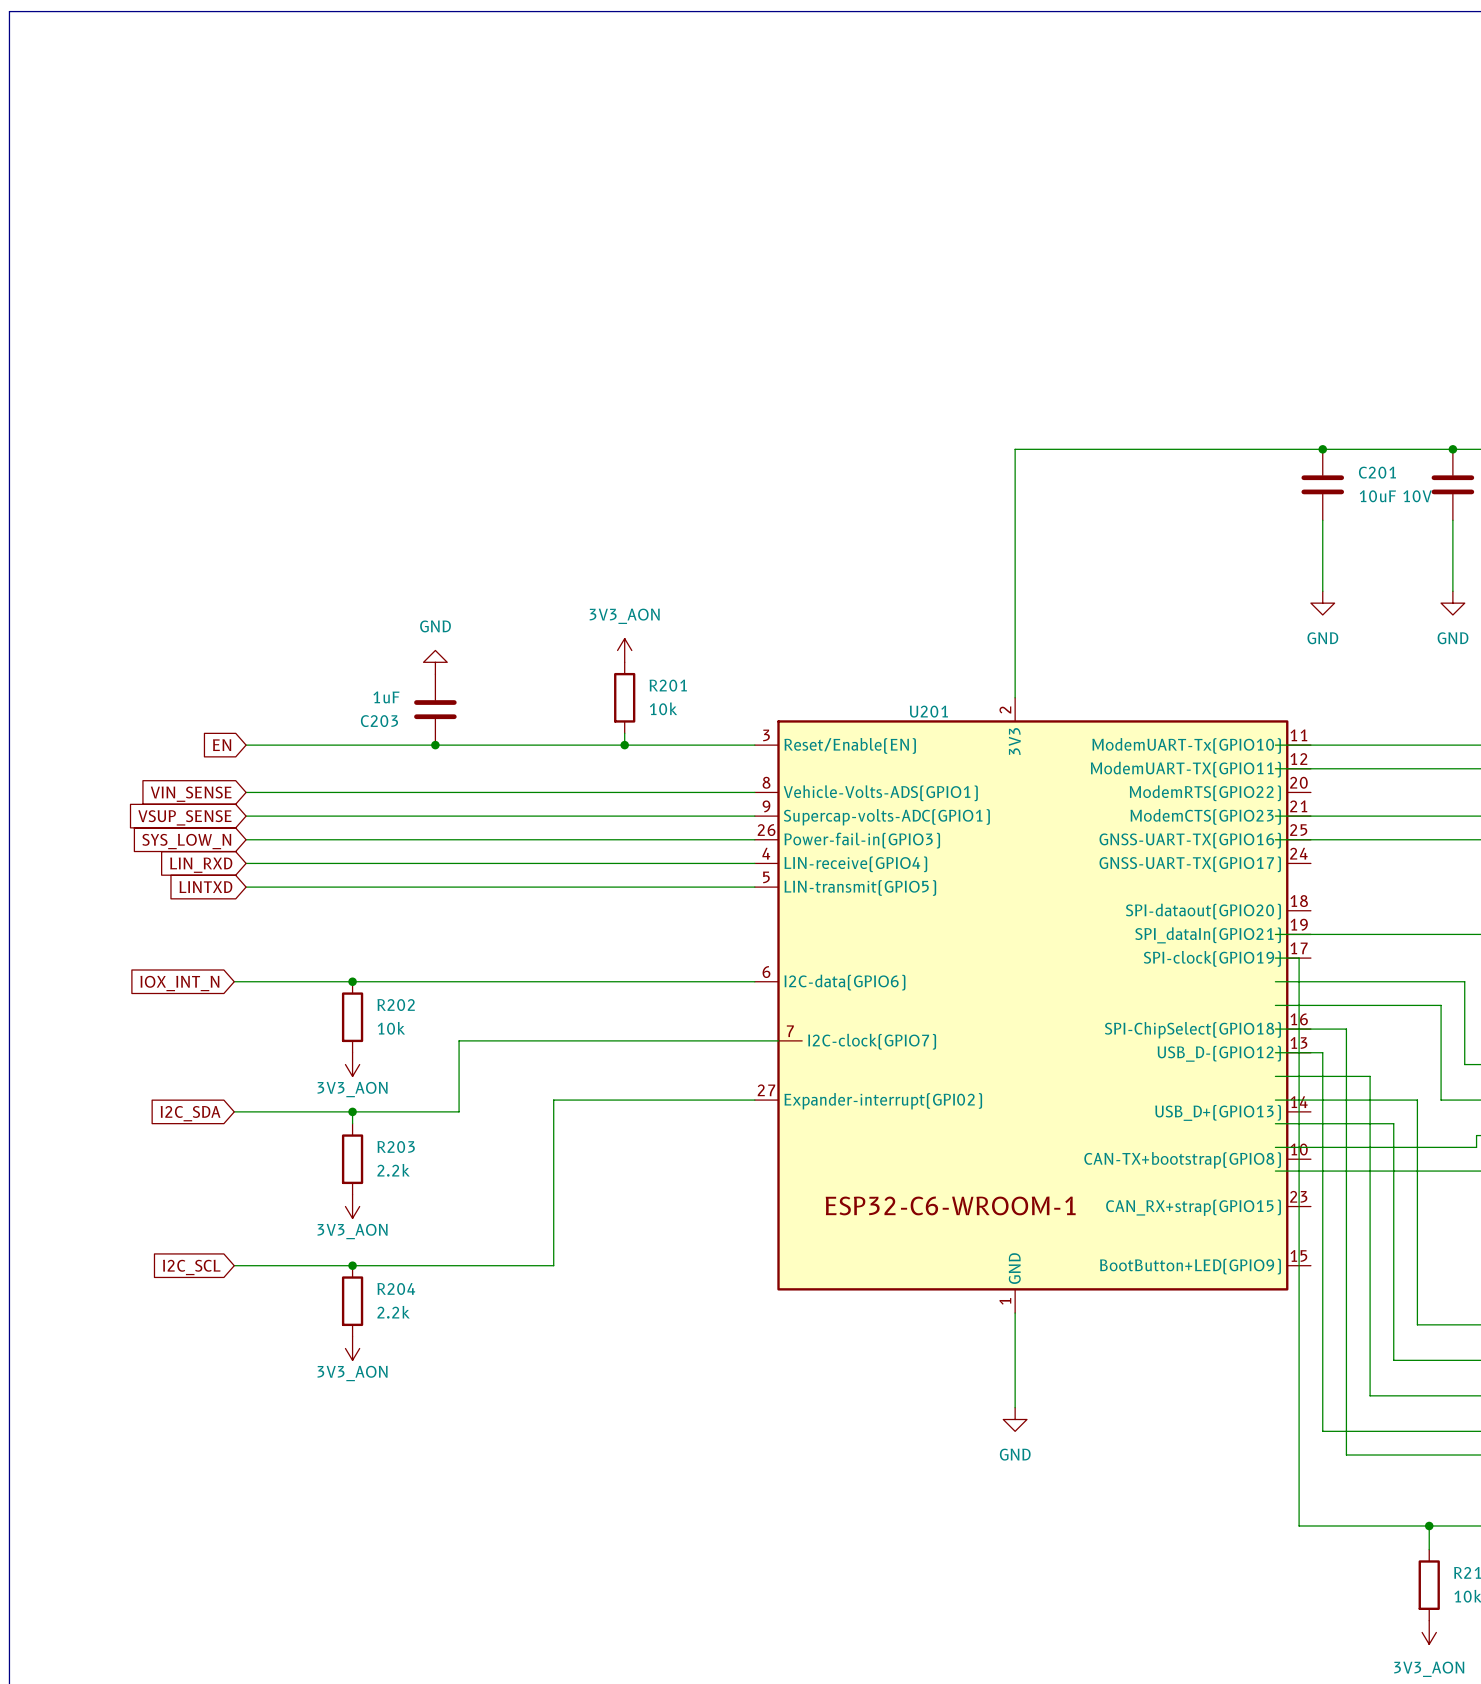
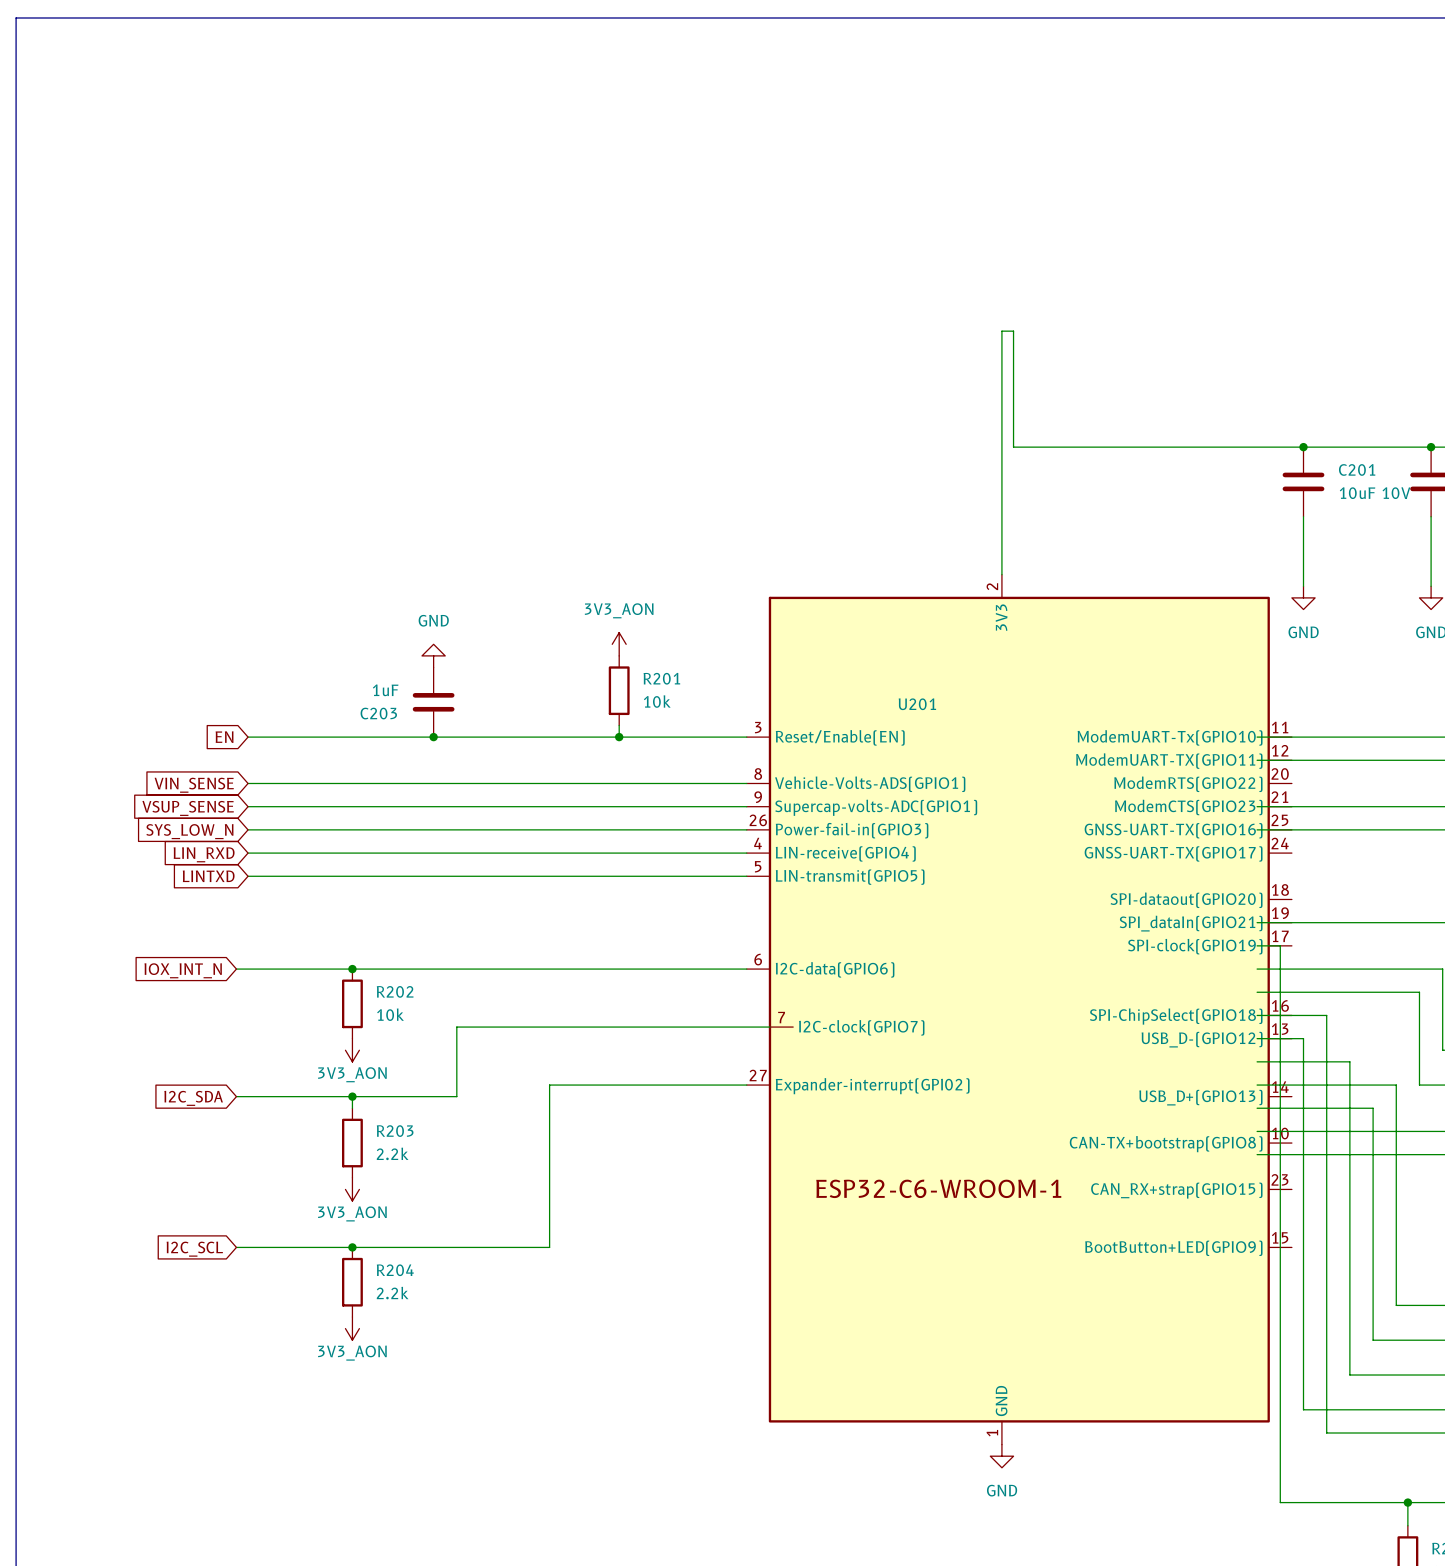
wire: (1015, 449) (1026, 449) -> (1001, 447) (1001, 331) (1013, 331) (1013, 447)
U201 symbol: [754, 697, 1311, 1314] -> [746, 574, 1292, 1445]
power symbol position: GND (1015, 1419) -> GND (1001, 1456)

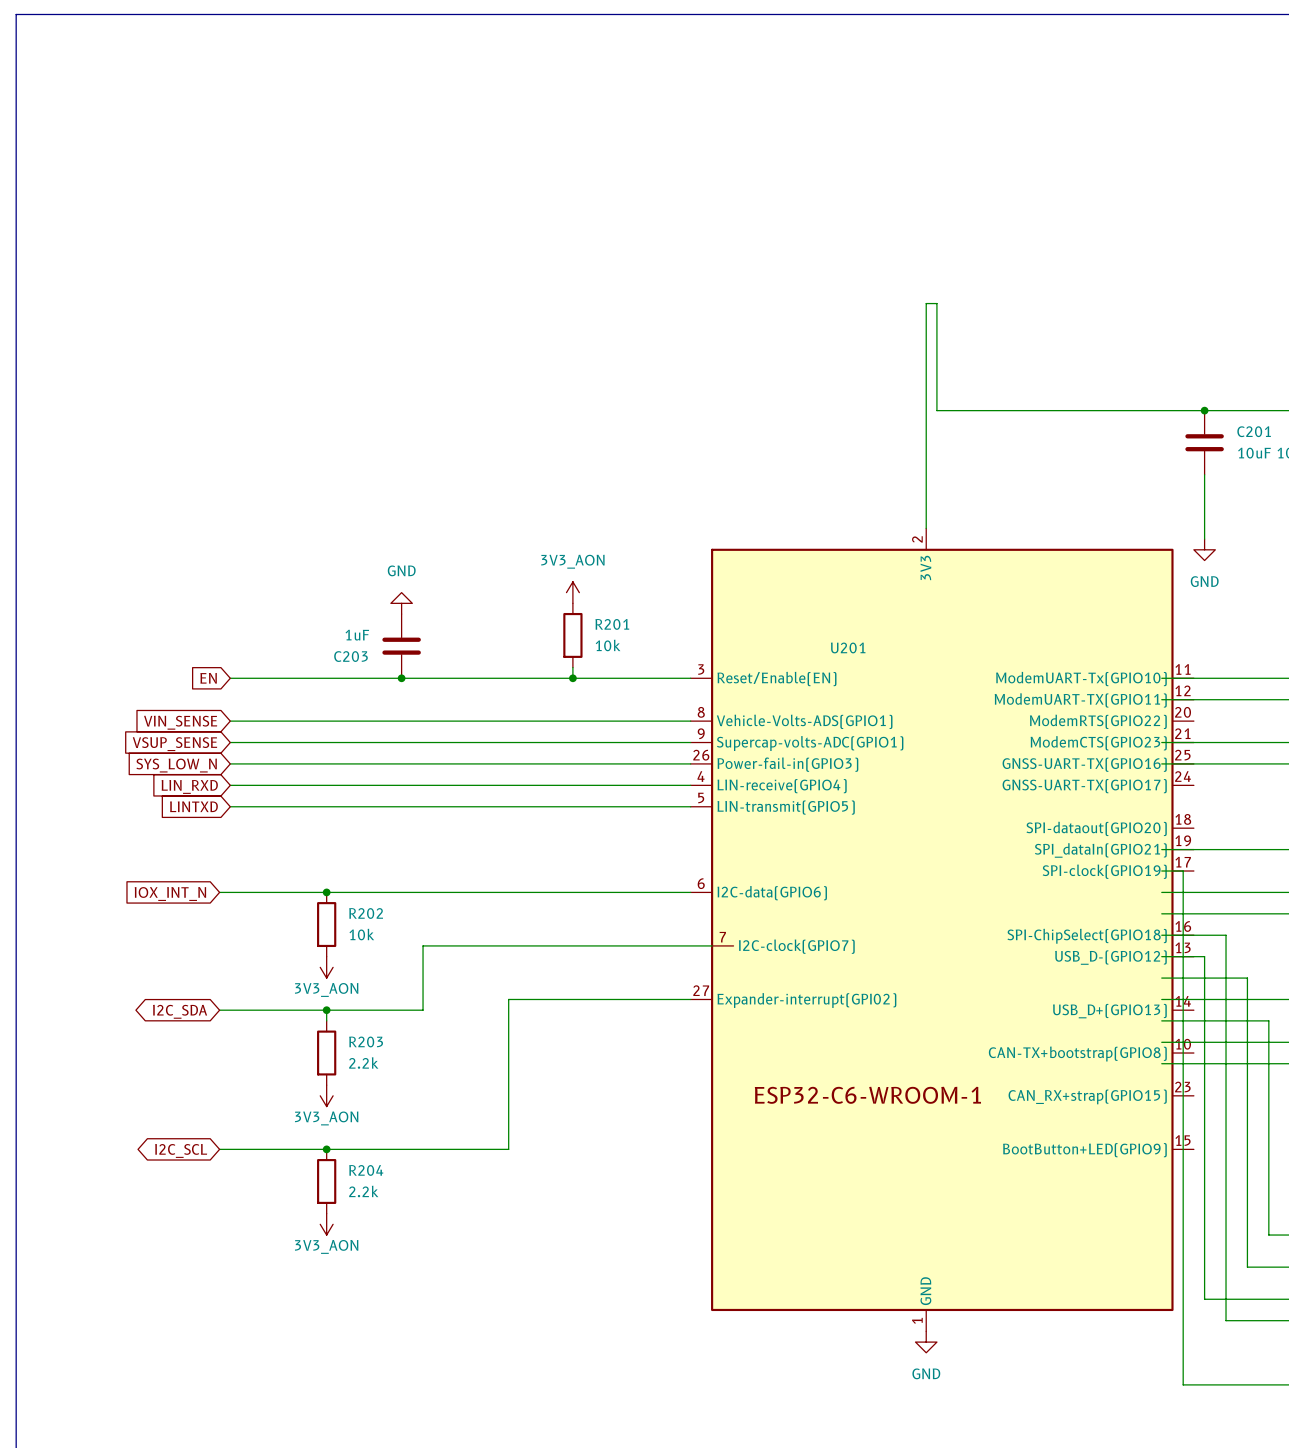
global label shape: input (193, 1098) -> bidirectional (180, 1011)
global label shape: input (194, 1249) -> bidirectional (181, 1150)

